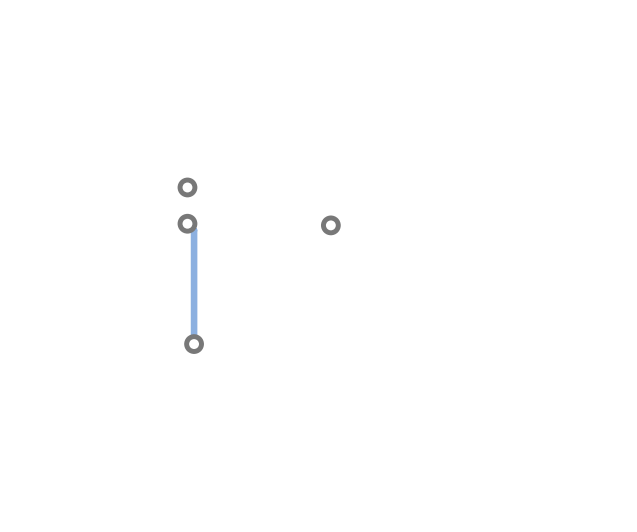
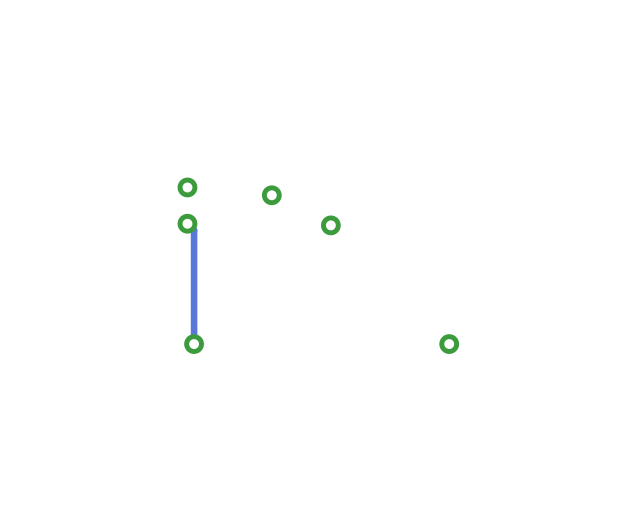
via: none -> (271, 195)
via: none -> (449, 344)

